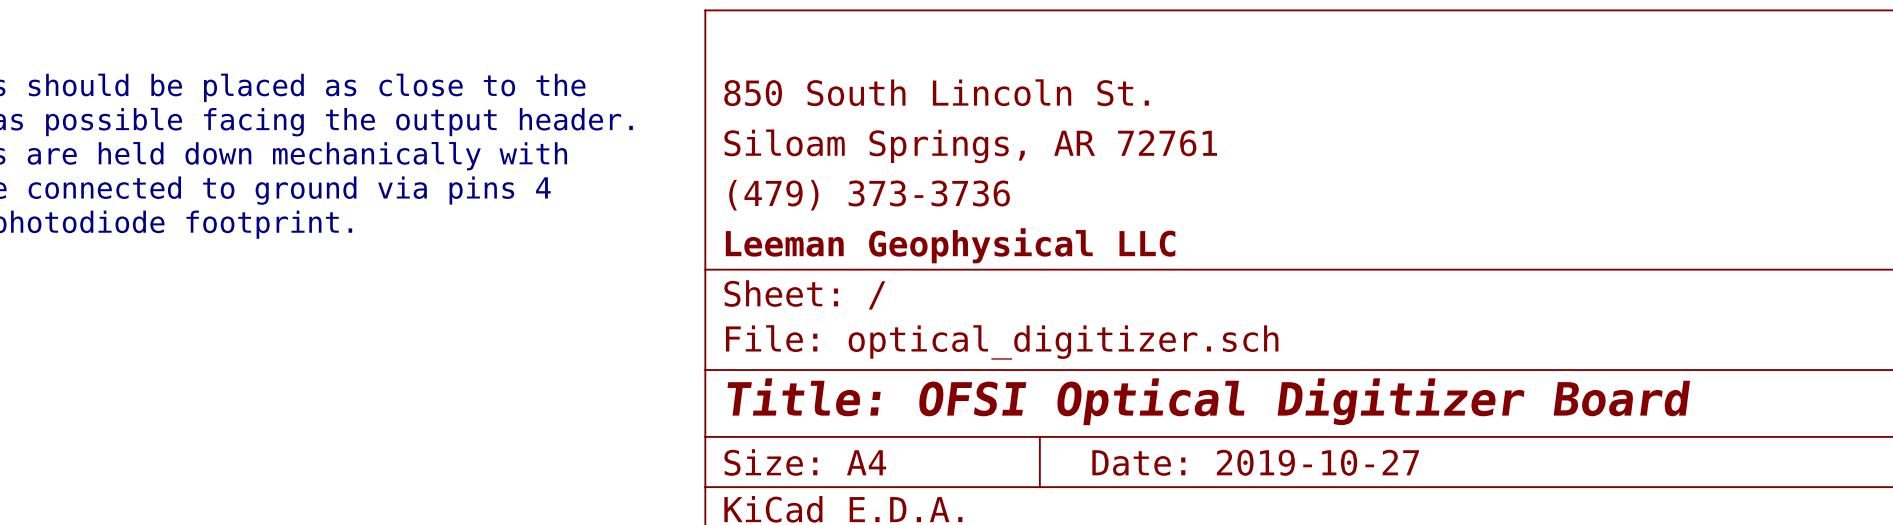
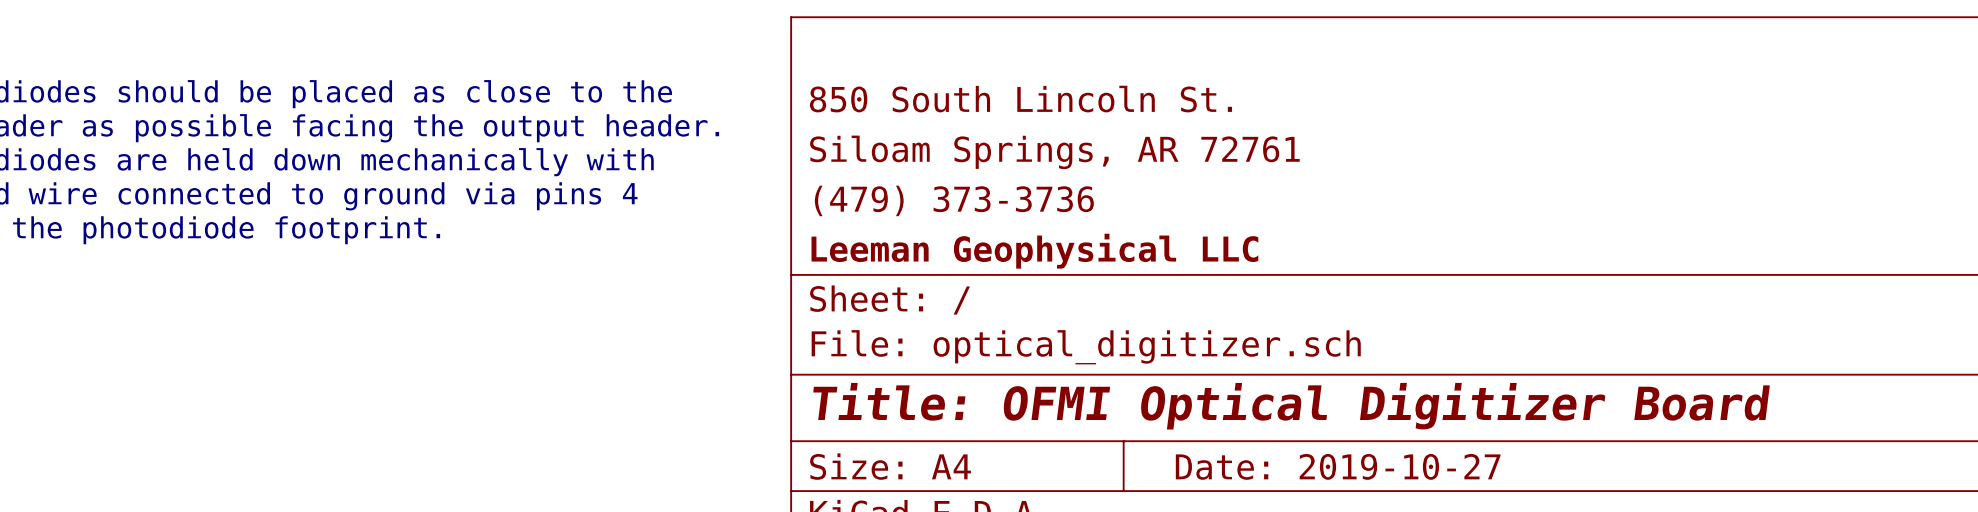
title block: Title: OFSI Optical Digitizer Board (1208, 401) -> Title: OFMI Optical Digitizer Board (1291, 406)

